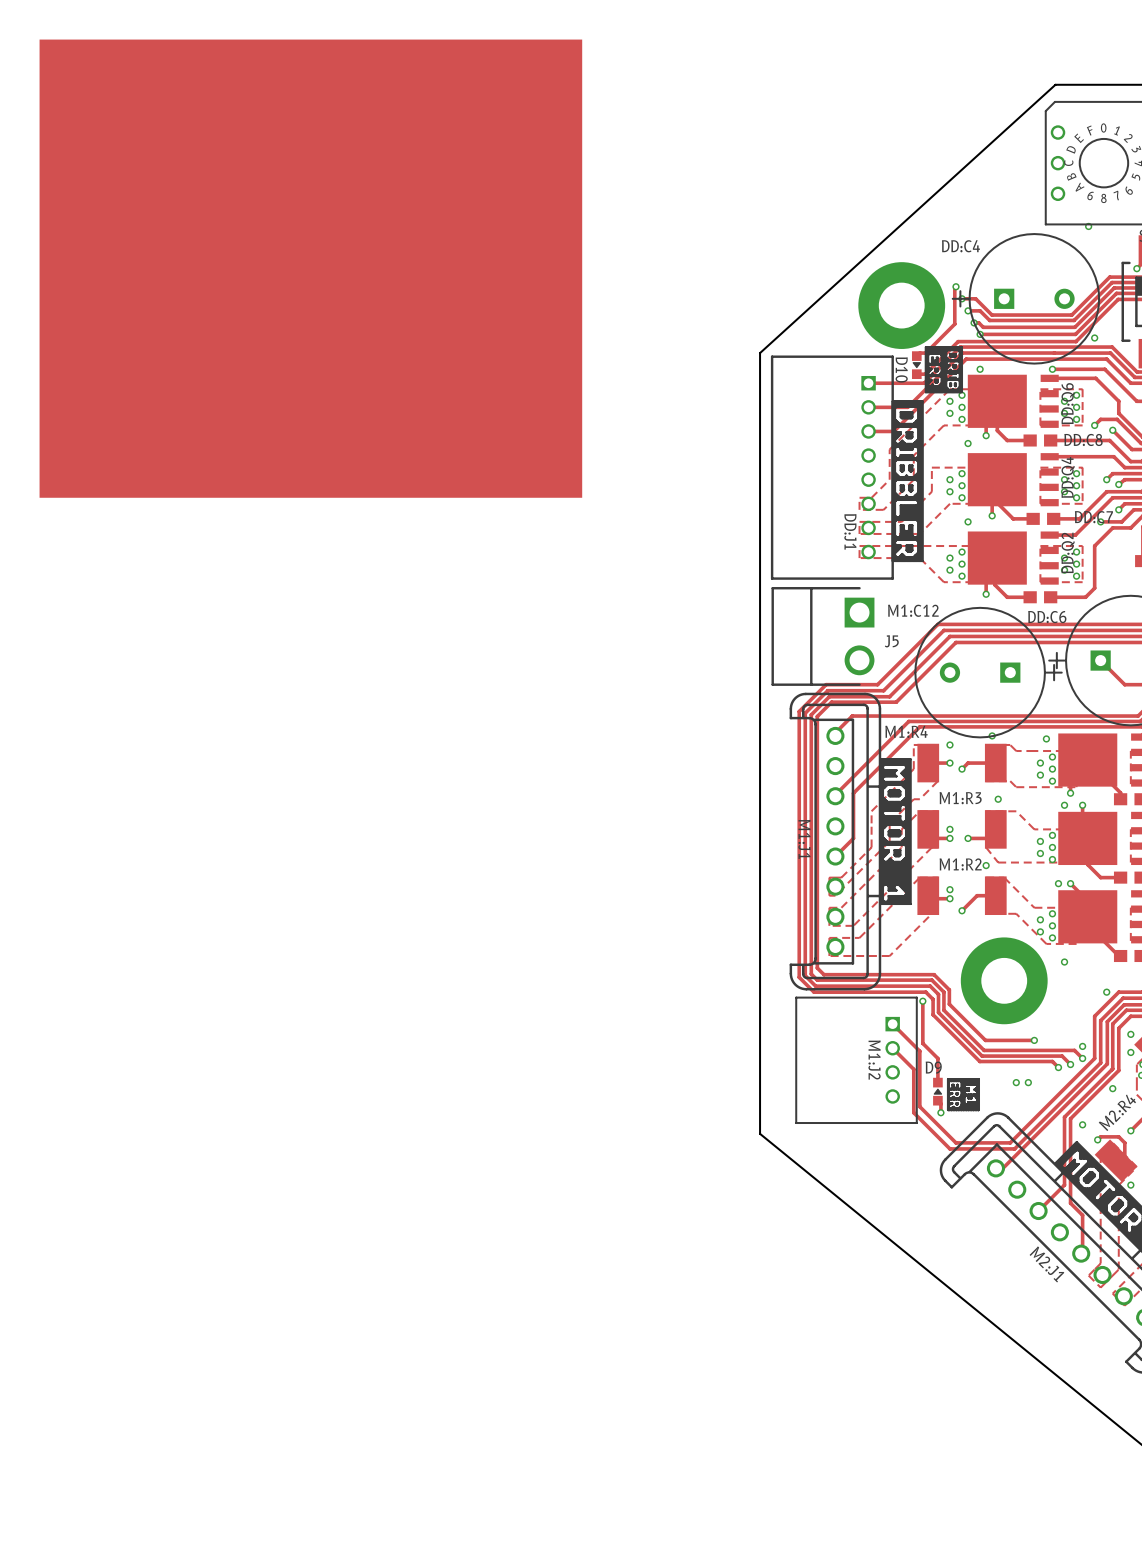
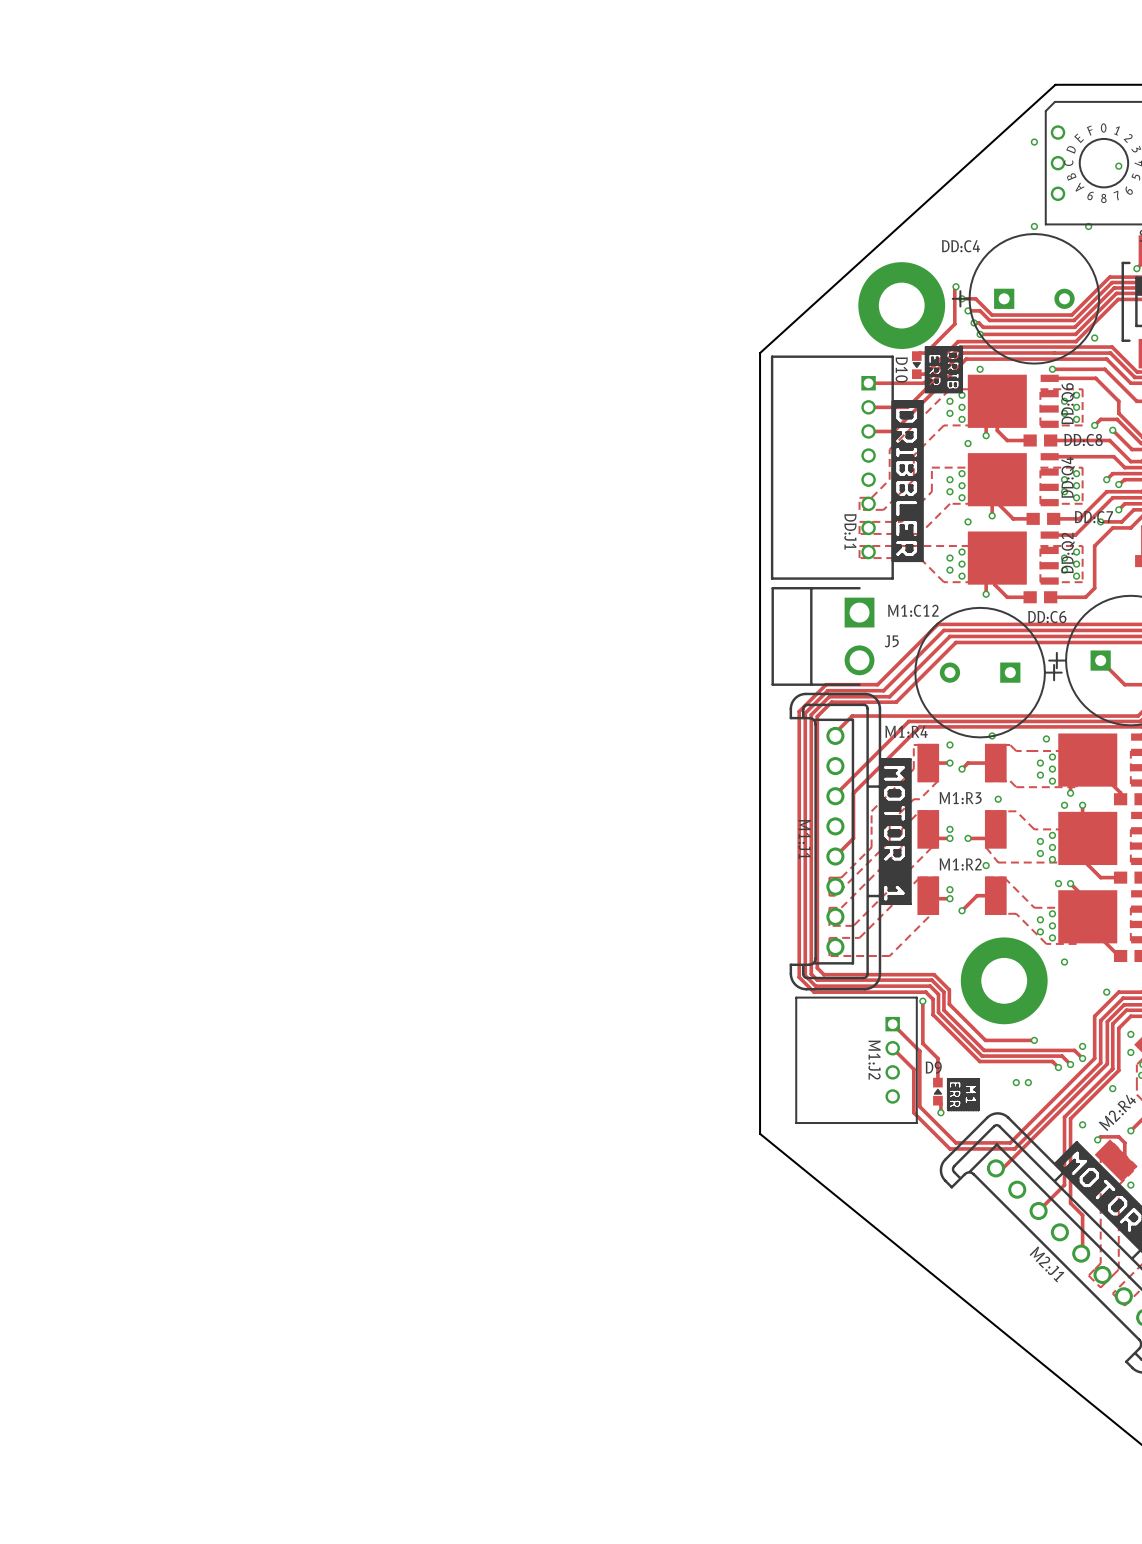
drawing: [39, 39, 583, 498] -> none
via: none -> (1034, 142)
via: none -> (1118, 166)
via: none -> (1034, 226)

